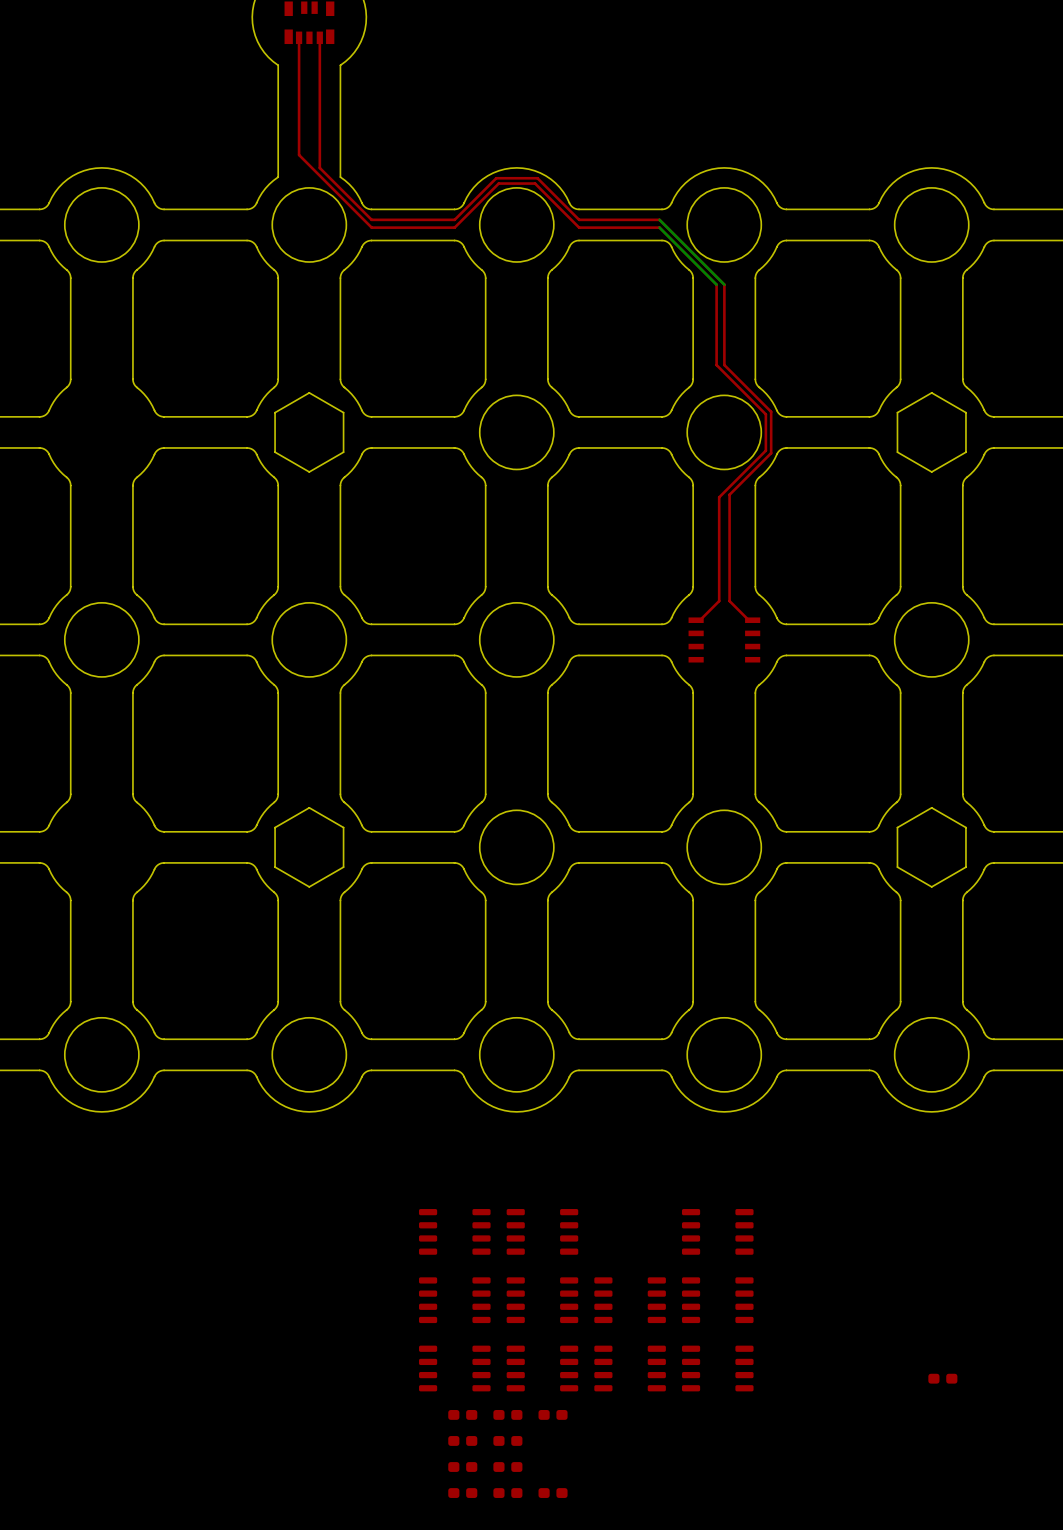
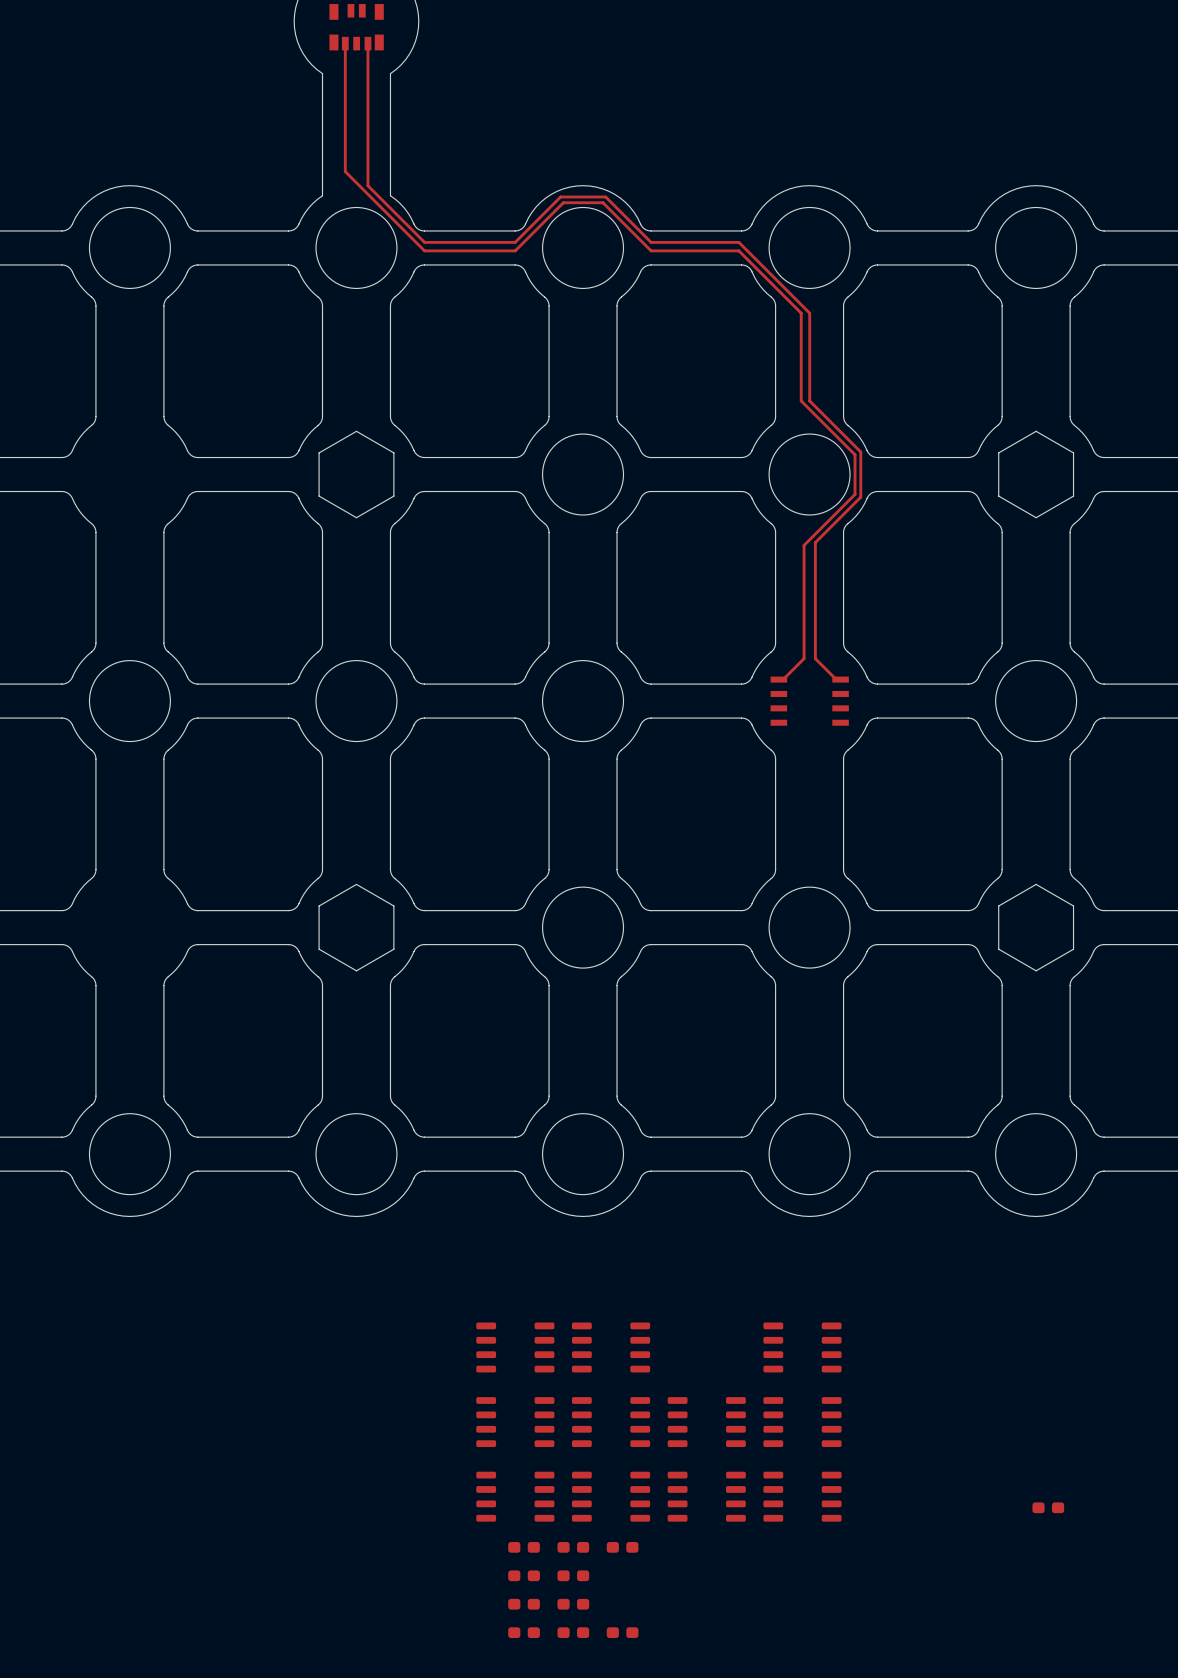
bottom track: (659, 219) (724, 284) -> none
bottom track: (659, 227) (716, 284) -> none

